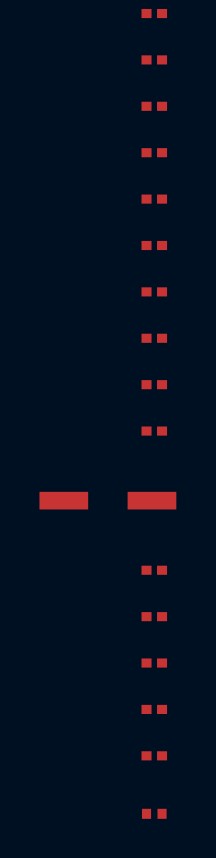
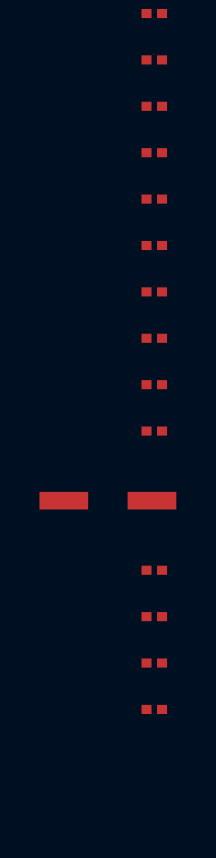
part: (154, 755) -> none
part: (154, 813) -> none

